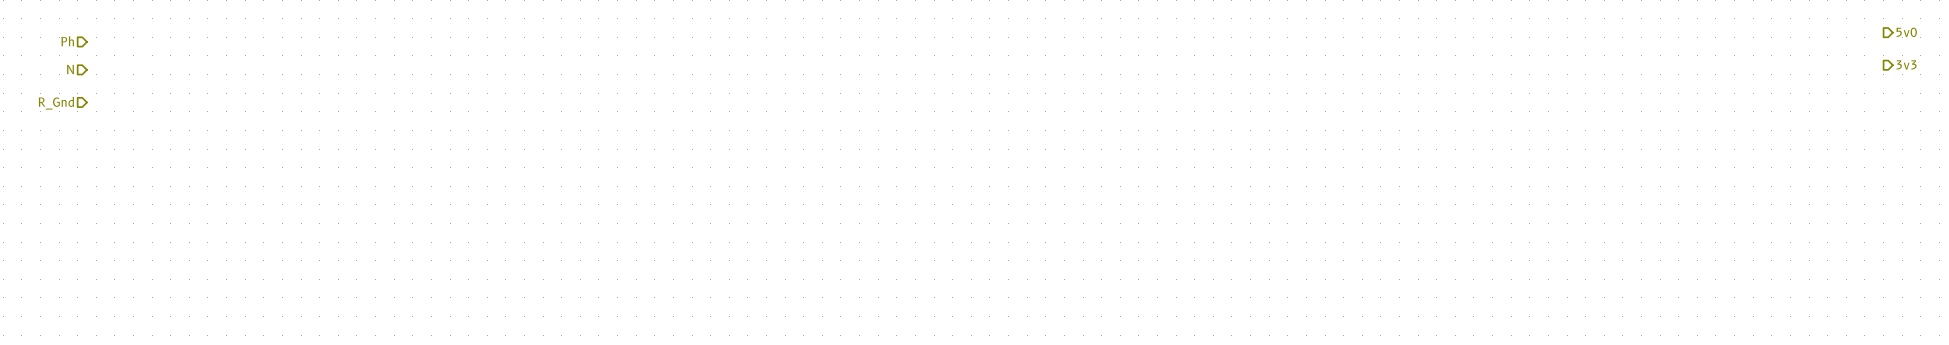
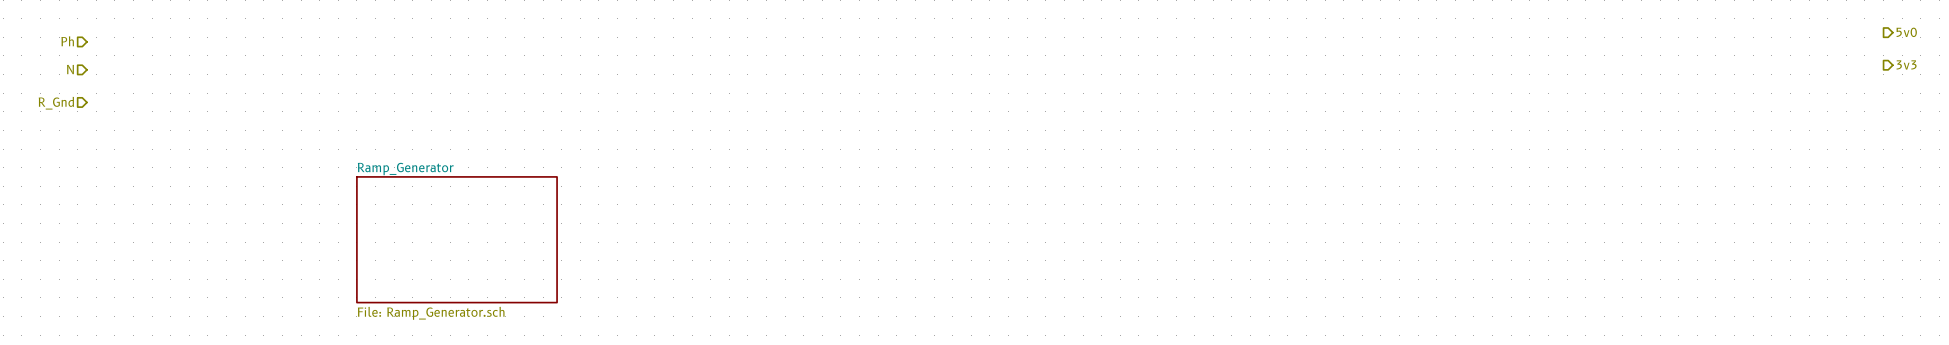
sheet Ramp_Generator: none -> File: Ramp_Generator.sch (456, 239)

